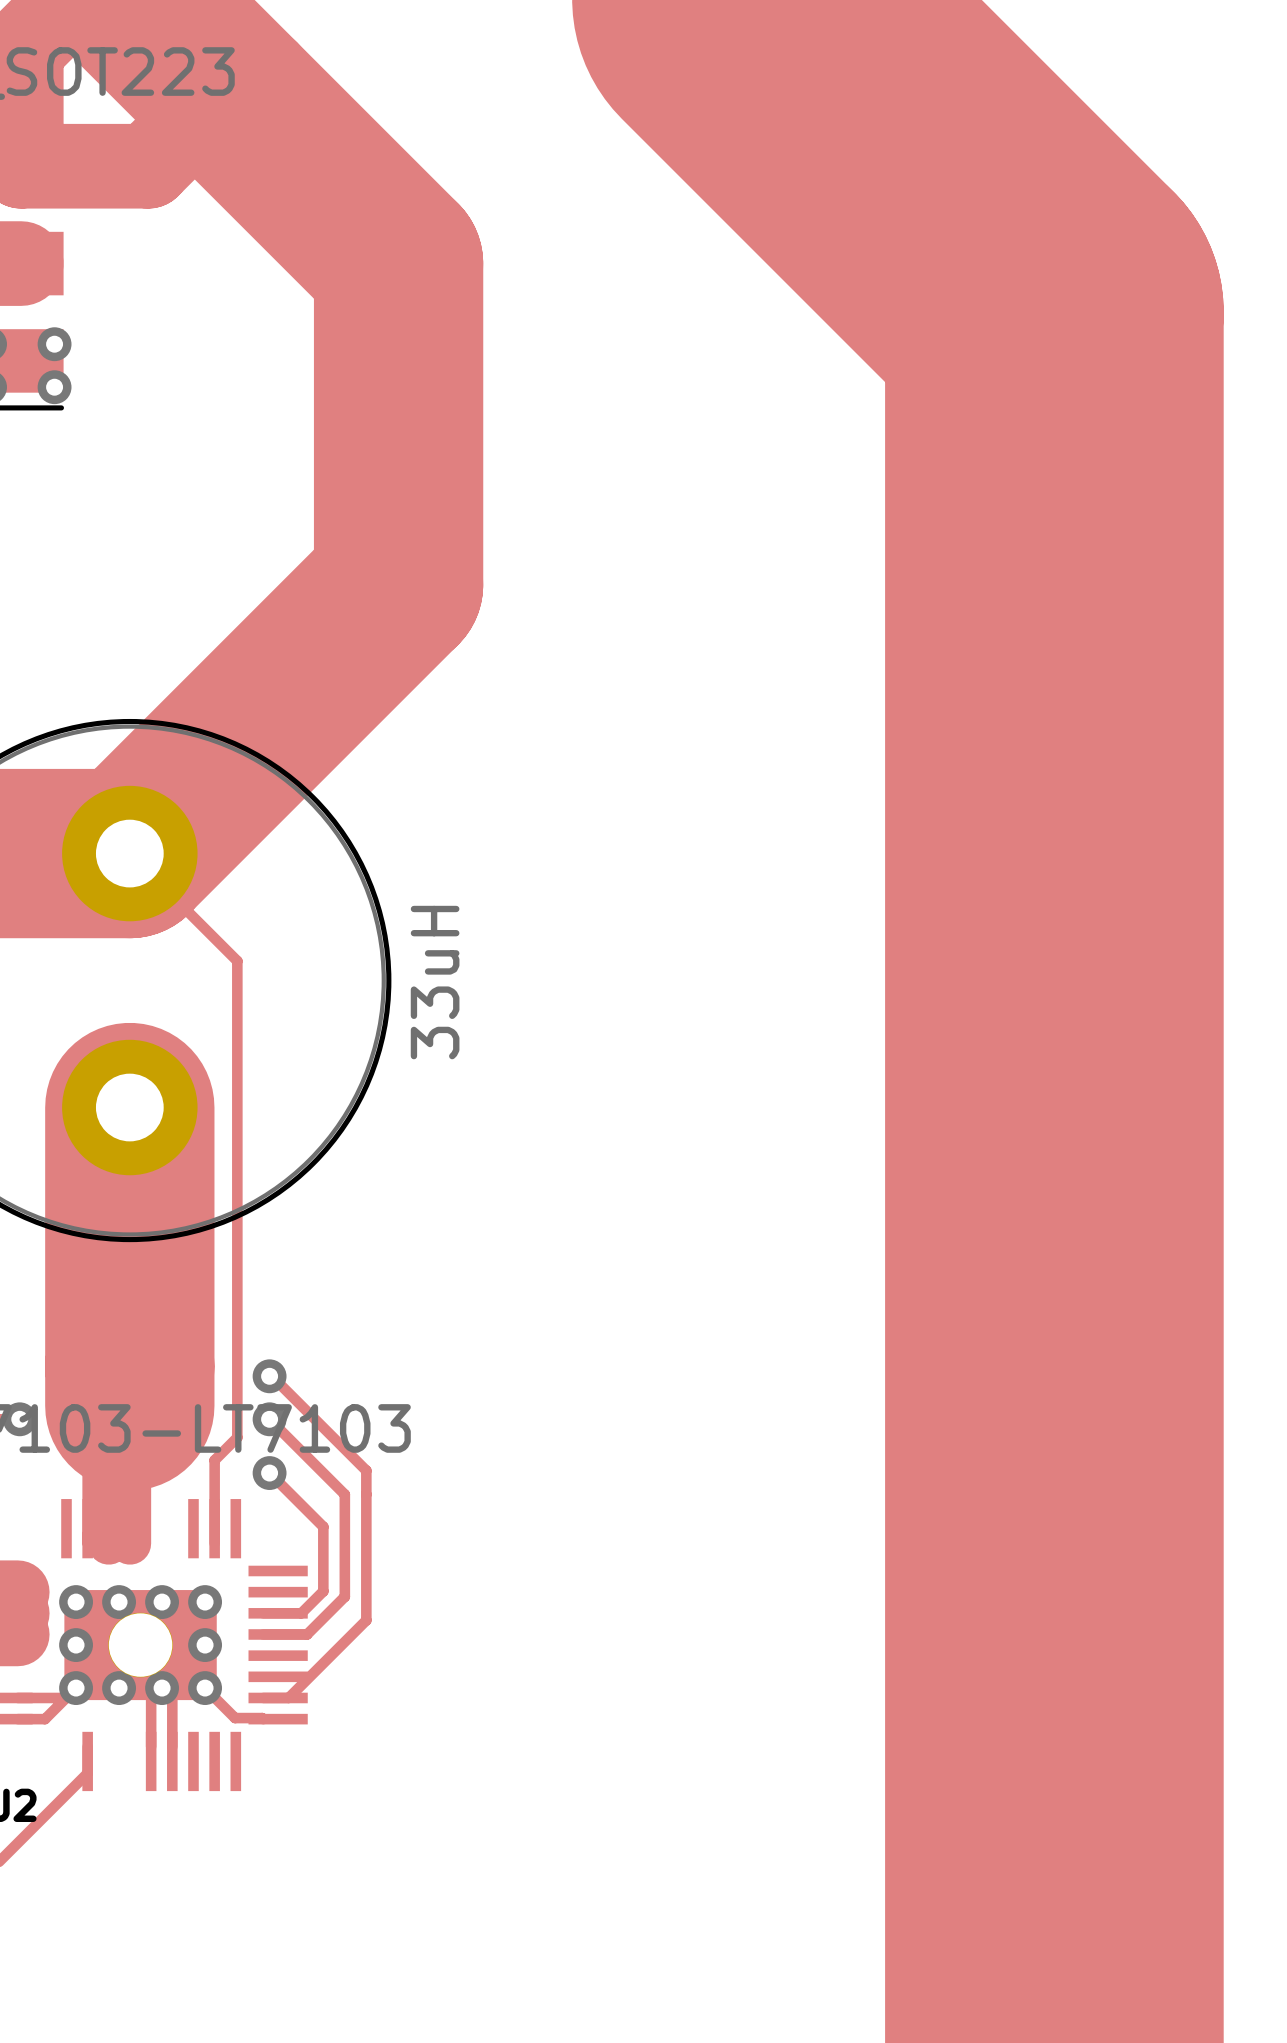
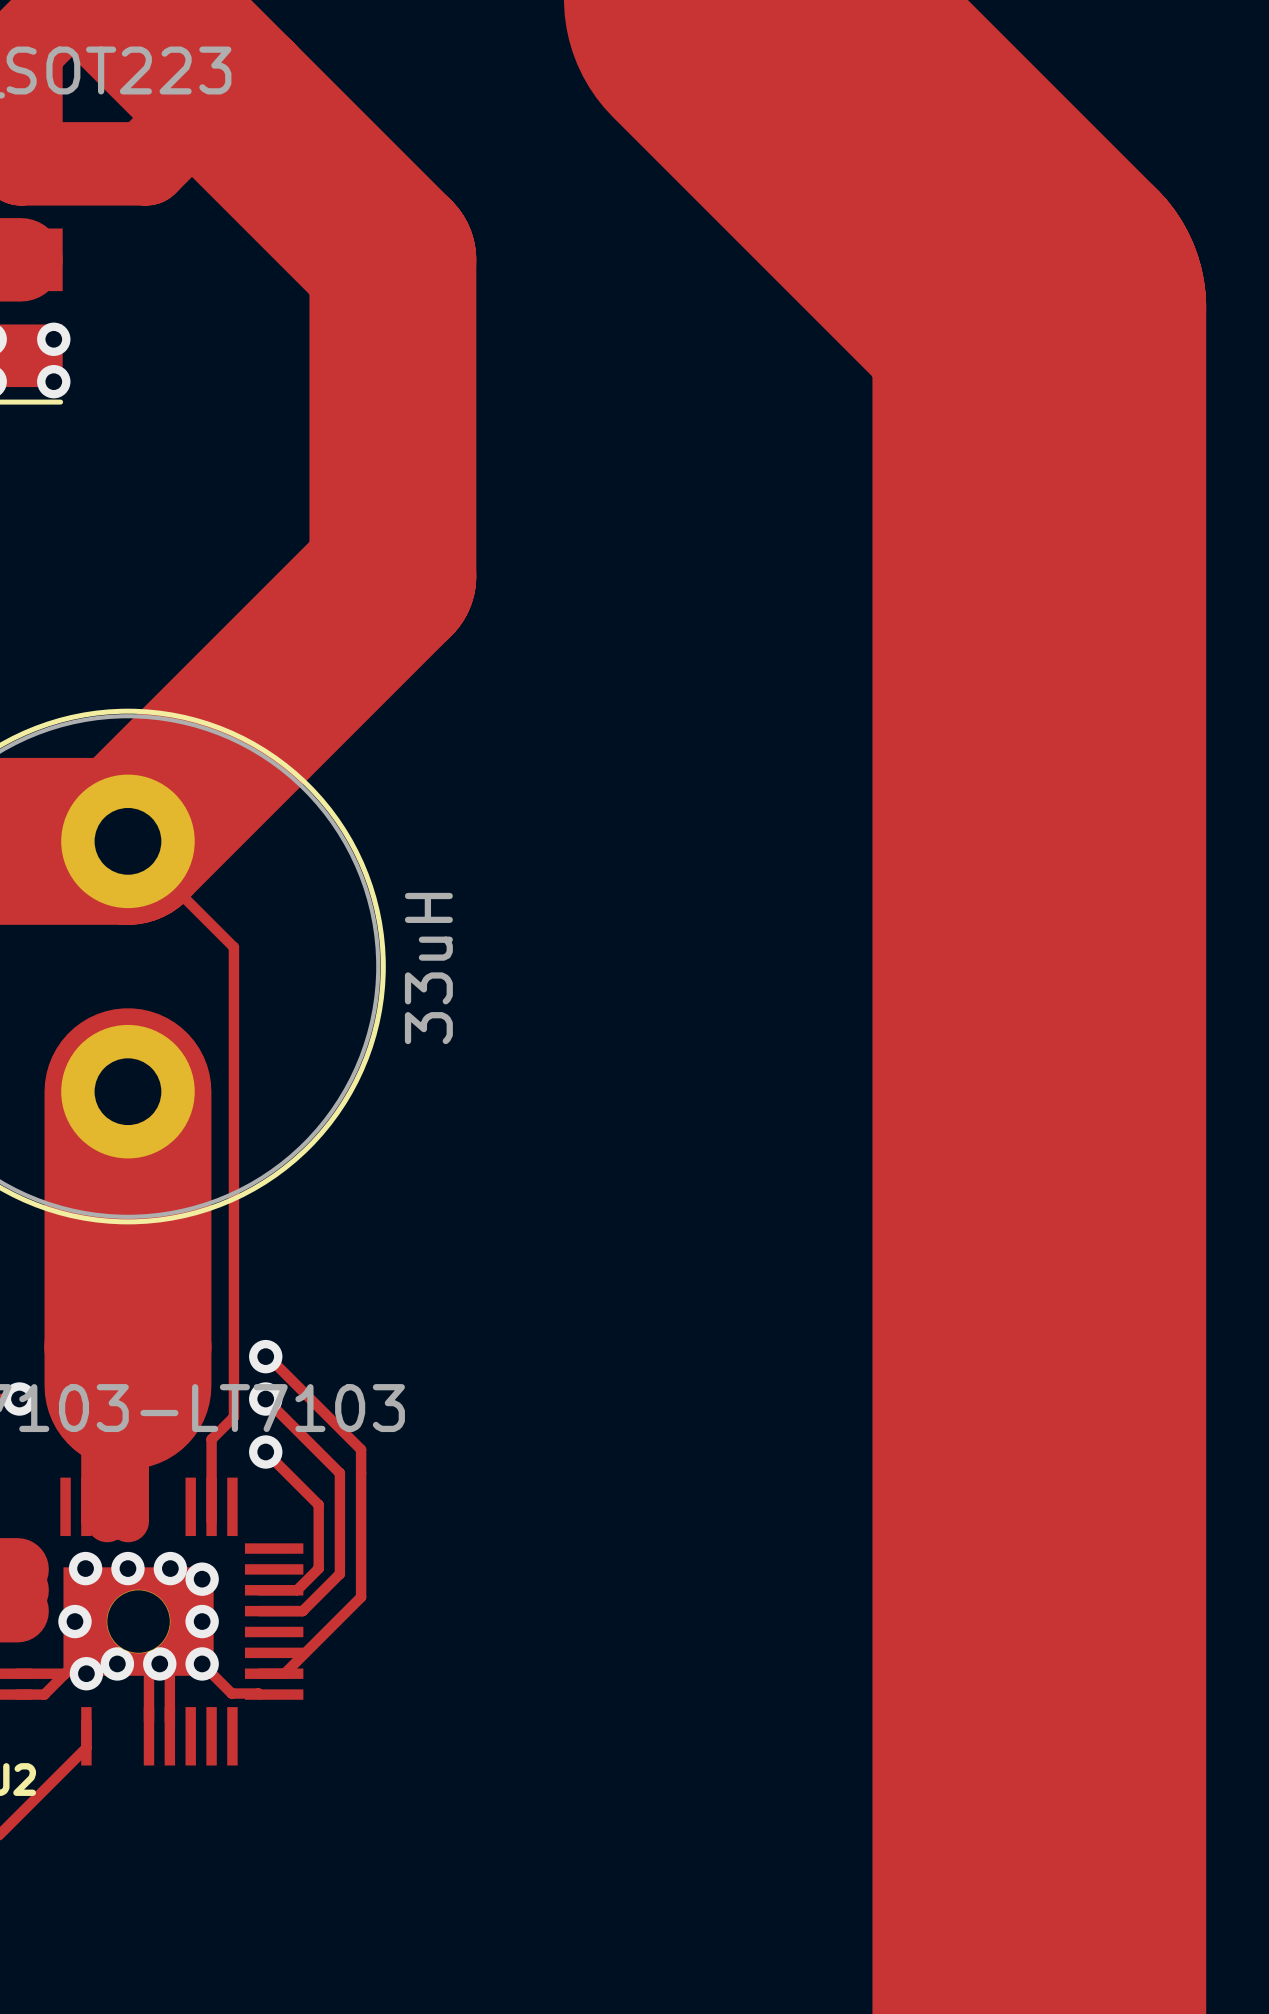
via position: (76, 1602) -> (85, 1568)
via position: (119, 1602) -> (127, 1568)
via position: (162, 1602) -> (170, 1568)
via position: (76, 1688) -> (86, 1673)

